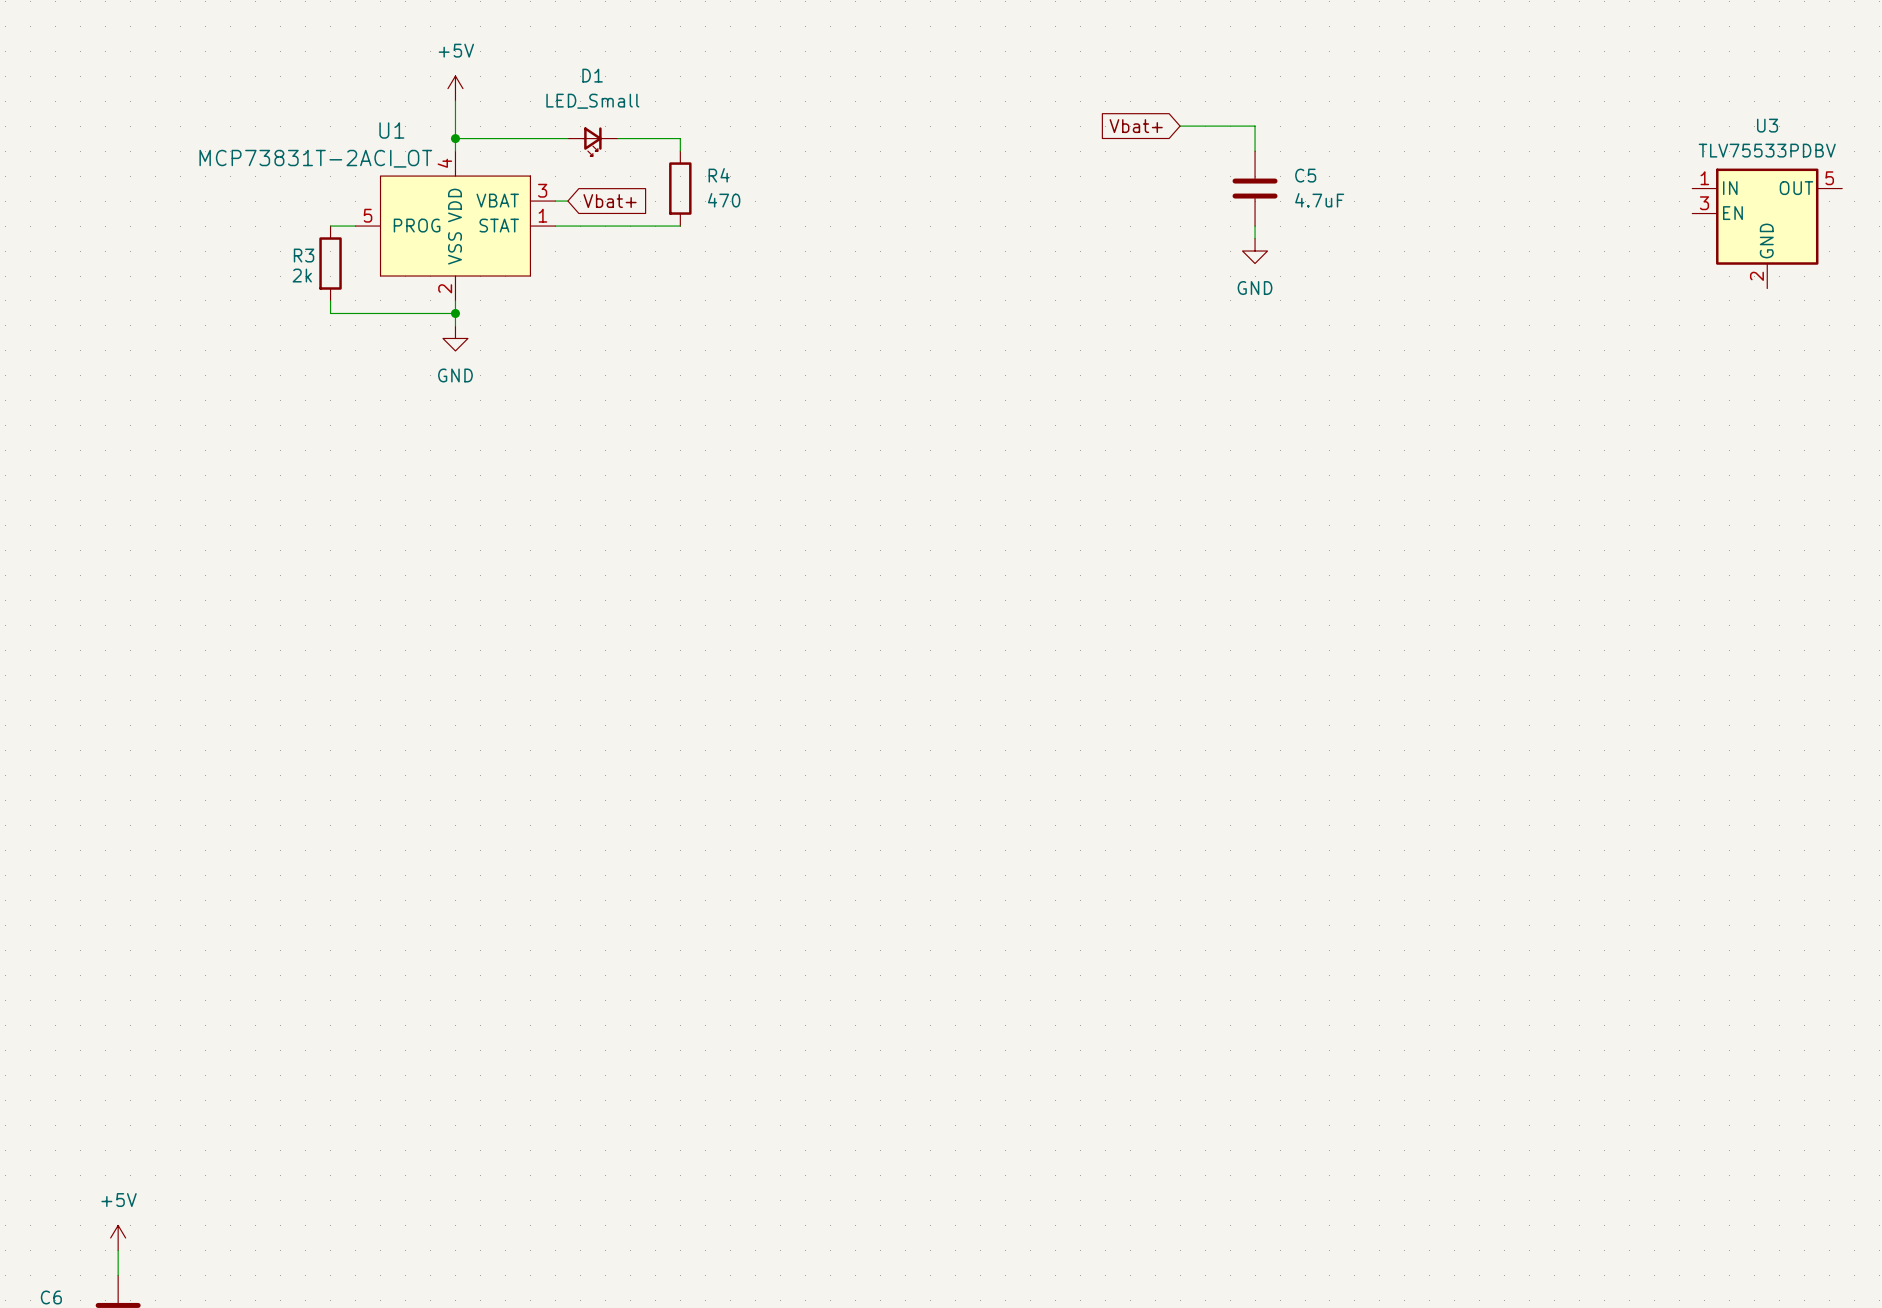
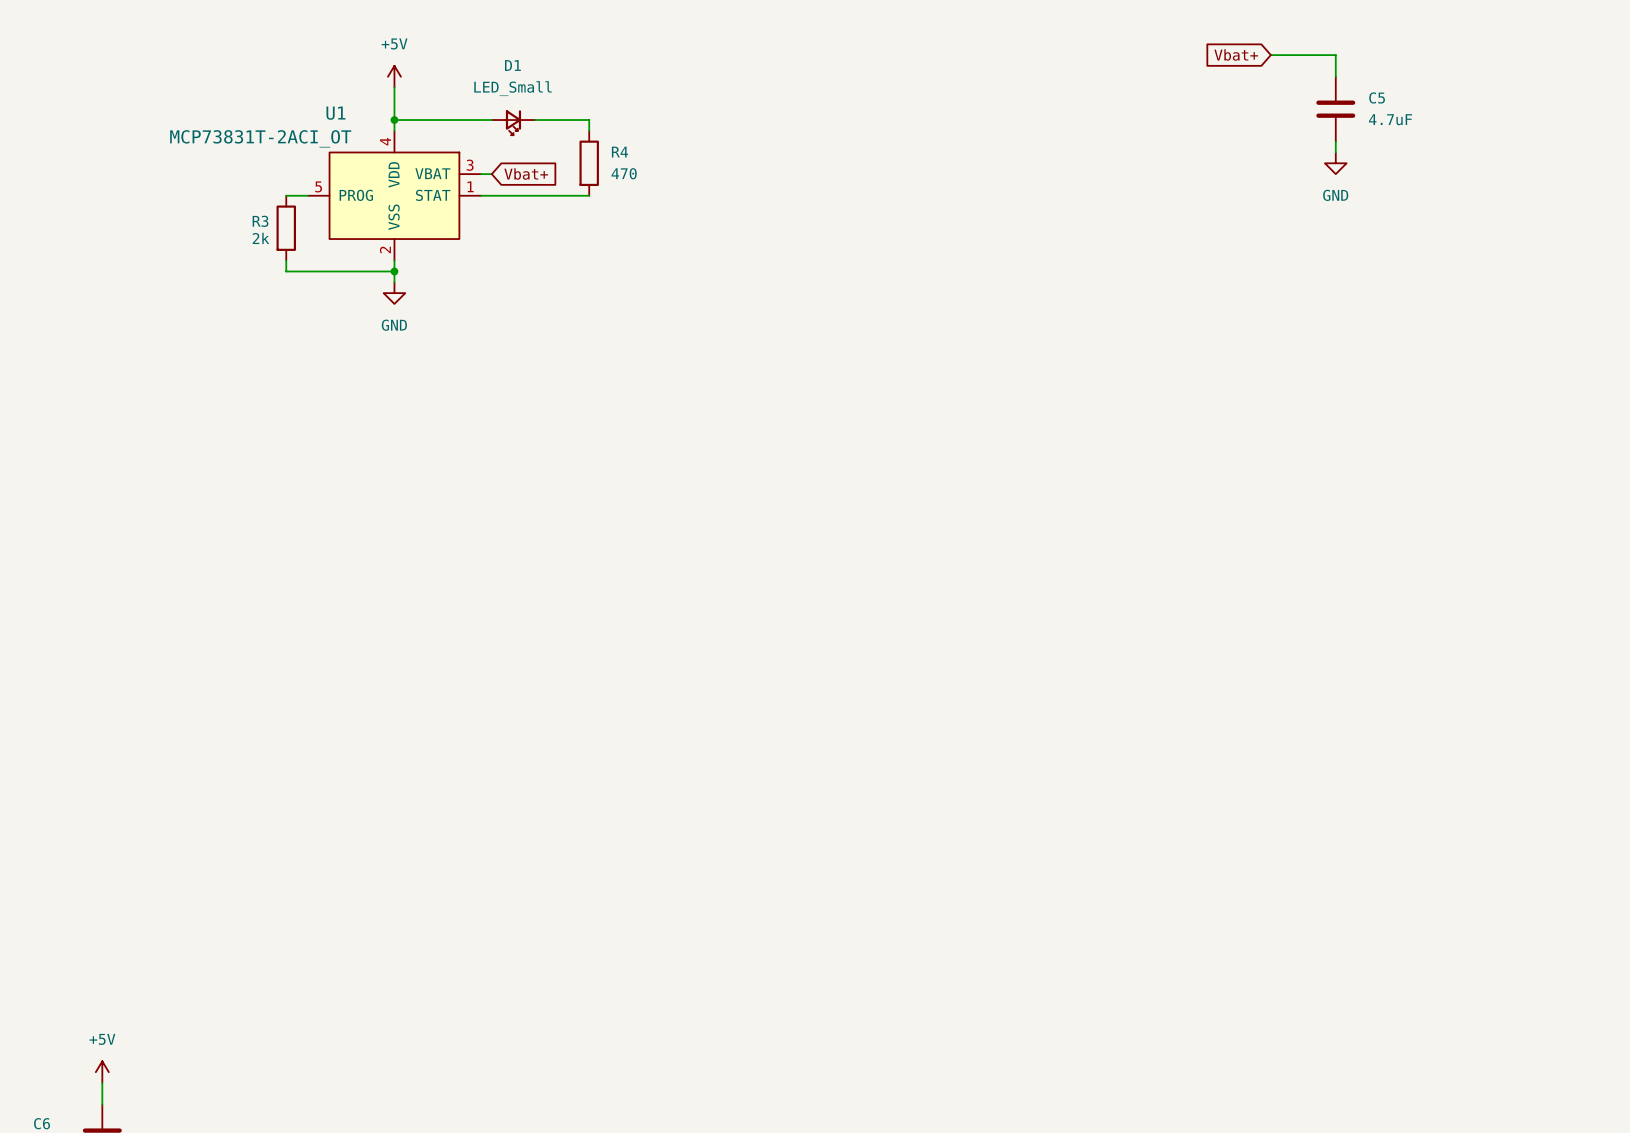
global label: none -> Vbat+ (1236, 54)
wire: none -> (1270, 55) (1335, 55) (1335, 76)
global label: Vbat+ (1136, 126) -> none
wire: (1180, 126) (1255, 126) (1255, 151) -> none
wire: none -> (1335, 141) (1335, 152)
C5 position: (1255, 188) -> (1335, 109)
power symbol: none -> GND (1335, 163)
wire: (1255, 226) (1255, 238) -> none
U3: TLV75533PDBV (1767, 228) -> none
power symbol: GND (1255, 251) -> none

